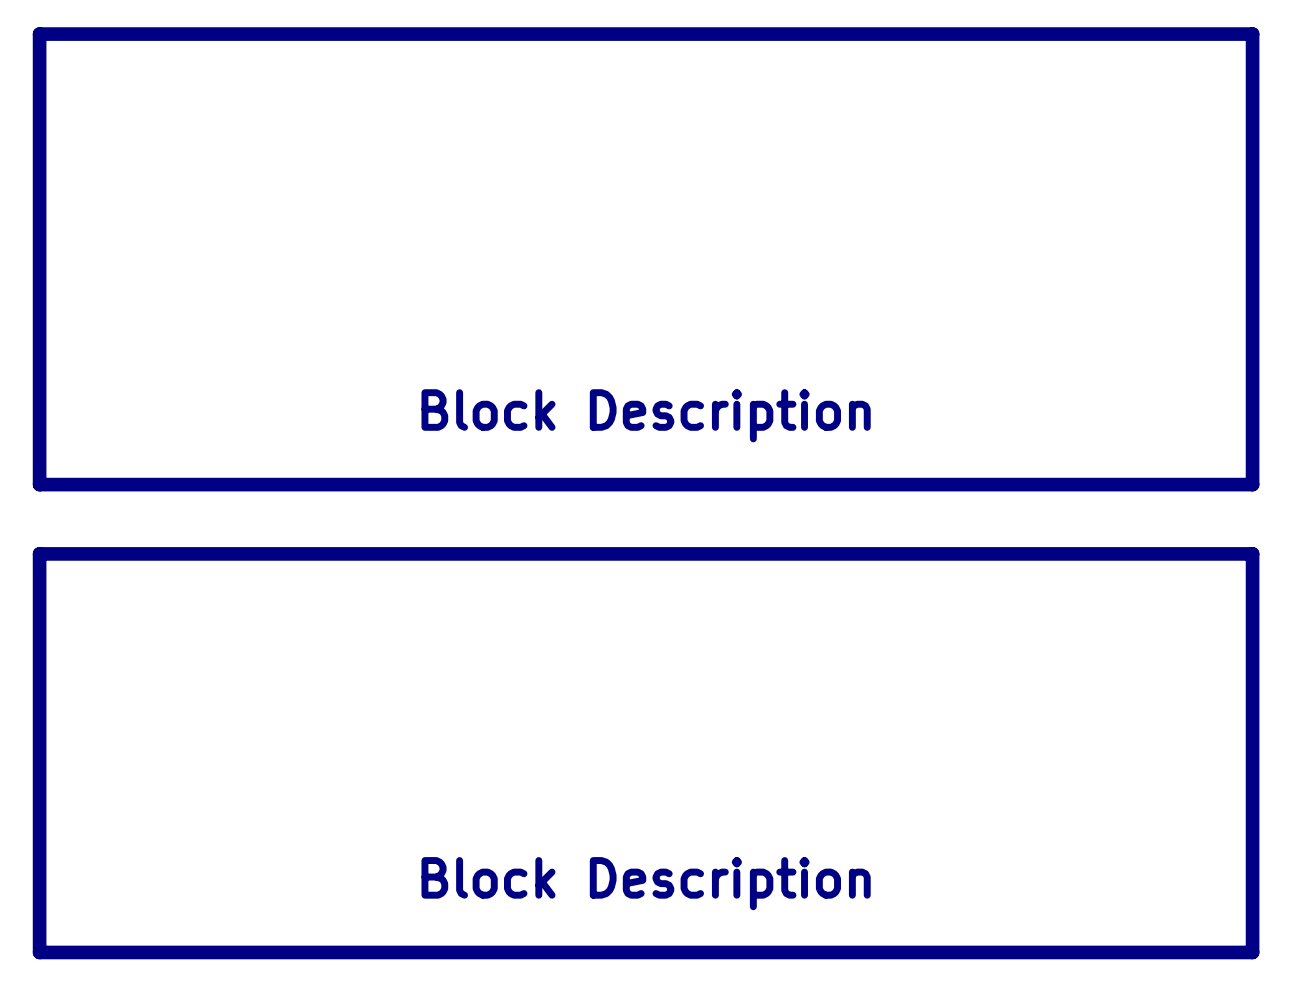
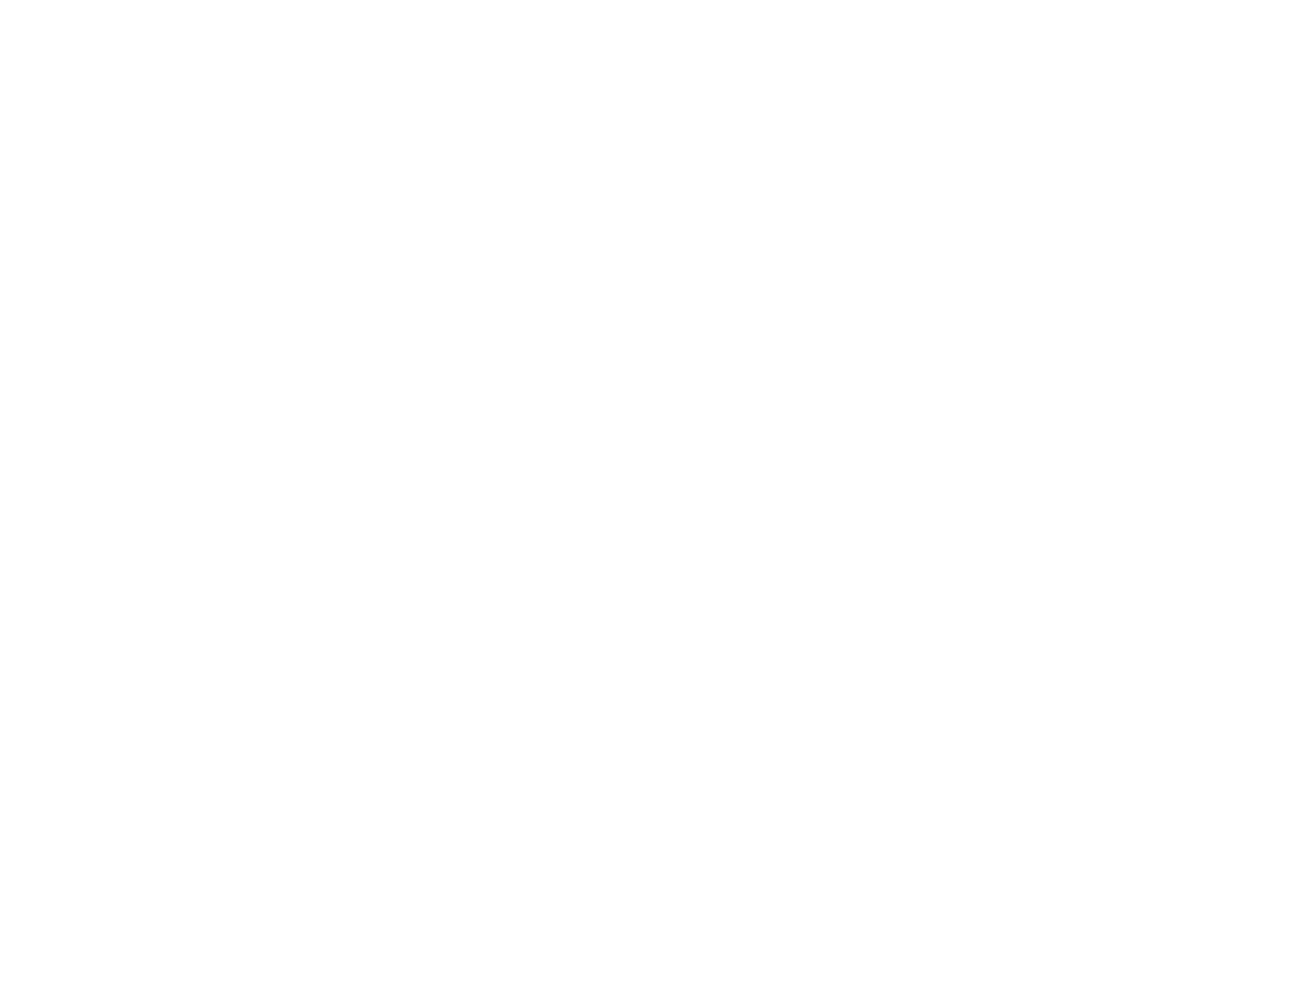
line: (39, 34) (39, 484) (1252, 484) (1252, 34) (39, 34) -> none
text: Block Description (646, 415) -> none
line: (39, 553) (1252, 553) (1252, 952) (39, 952) (39, 553) -> none
text: Block Description (646, 883) -> none

